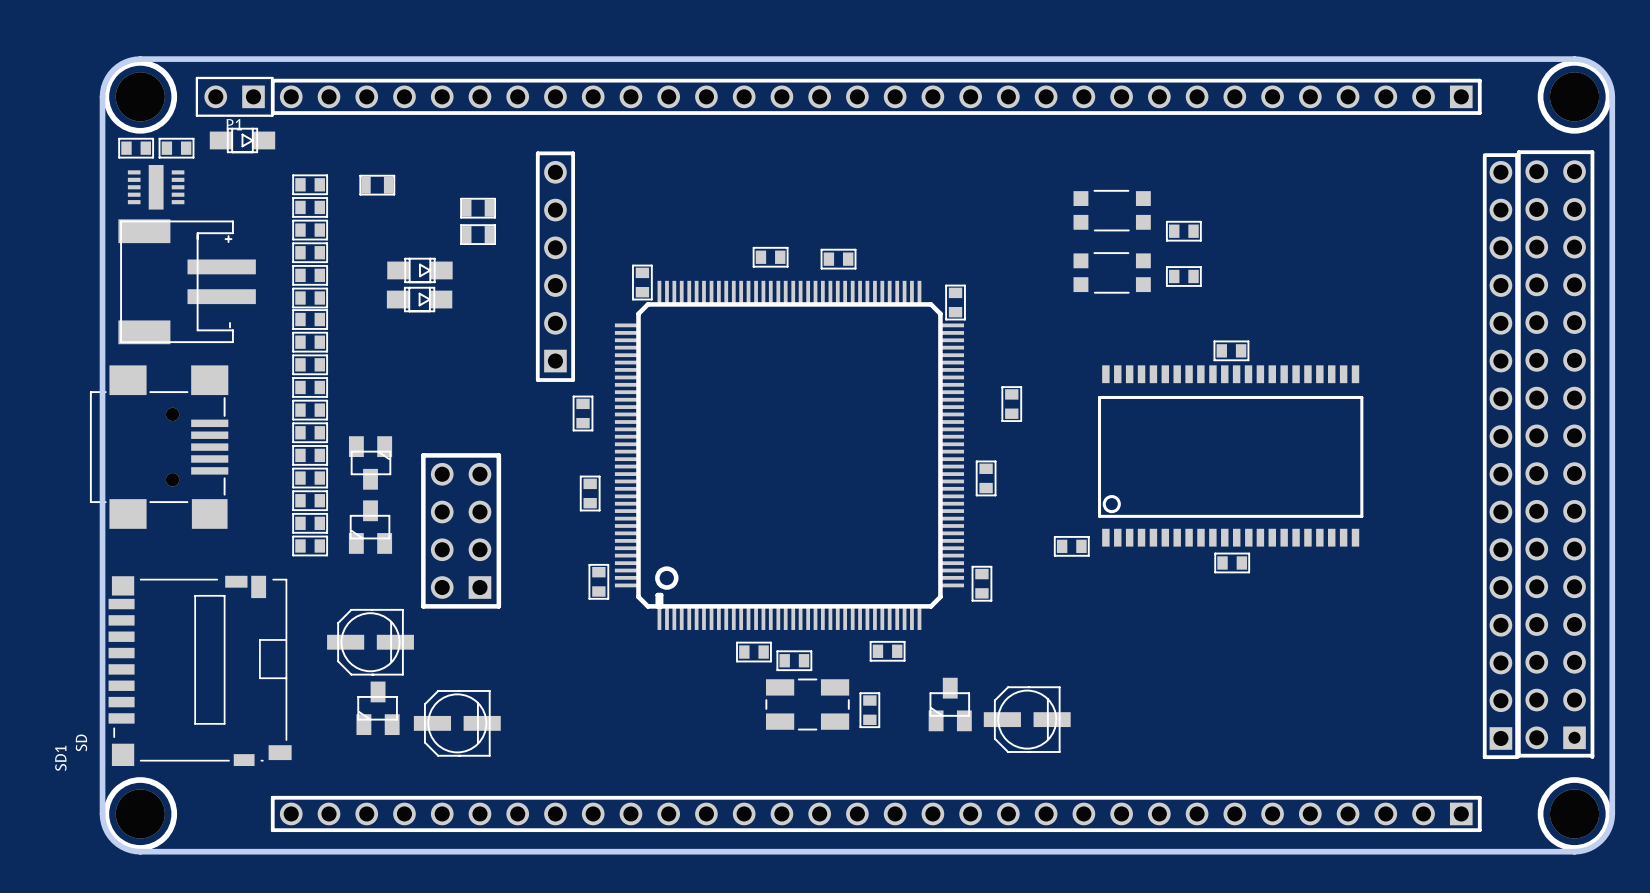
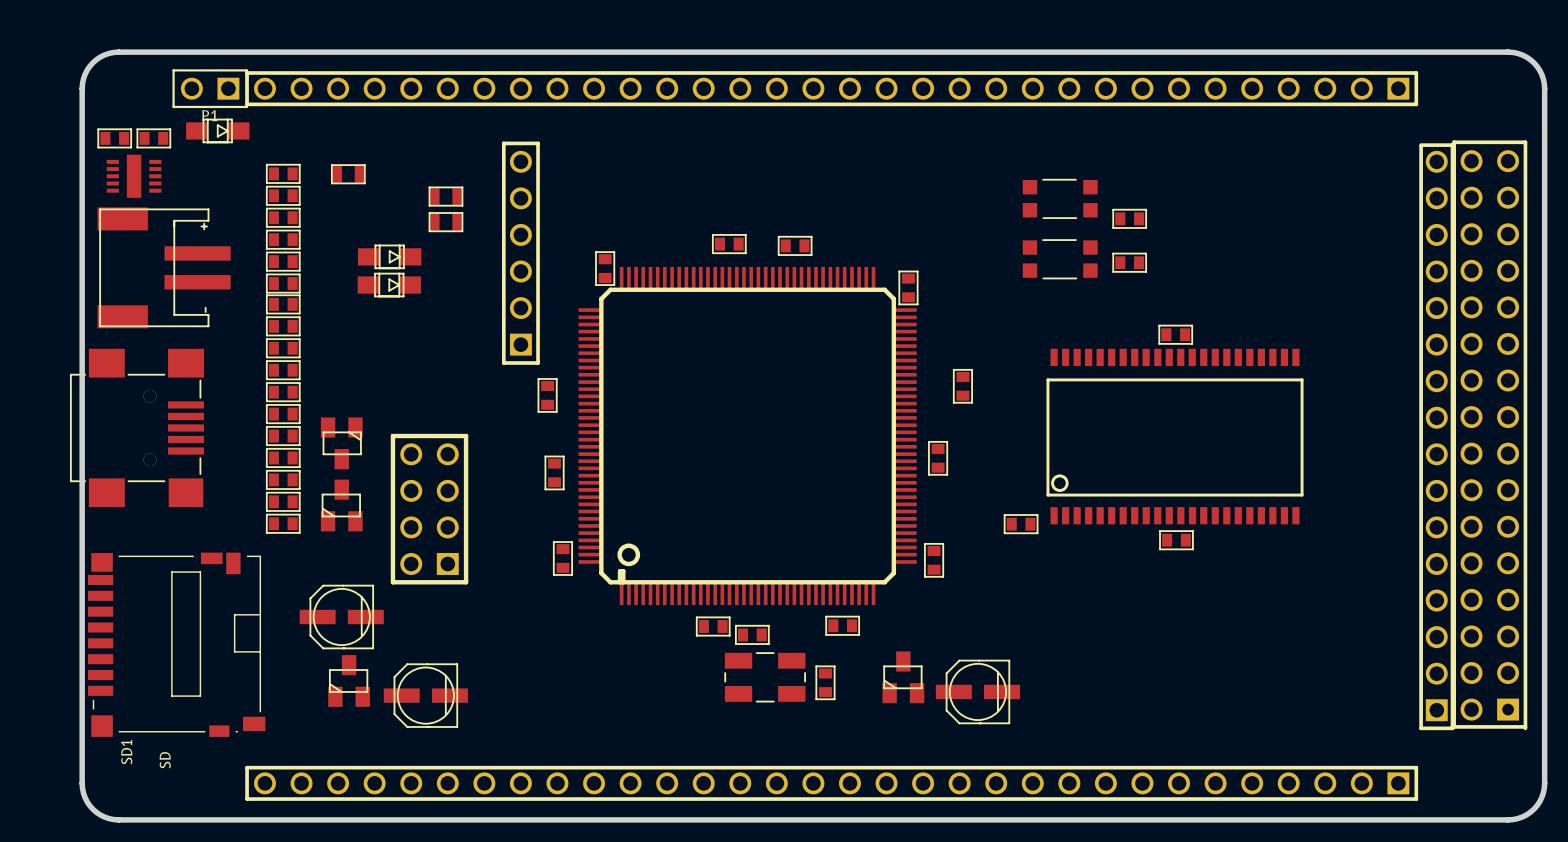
part: (140, 96) -> none
part: (1574, 96) -> none
SD1 value position: SD (81, 742) -> SD (165, 760)
SD1 name position: SD1 (60, 758) -> SD1 (126, 752)
part: (140, 813) -> none
part: (1574, 813) -> none

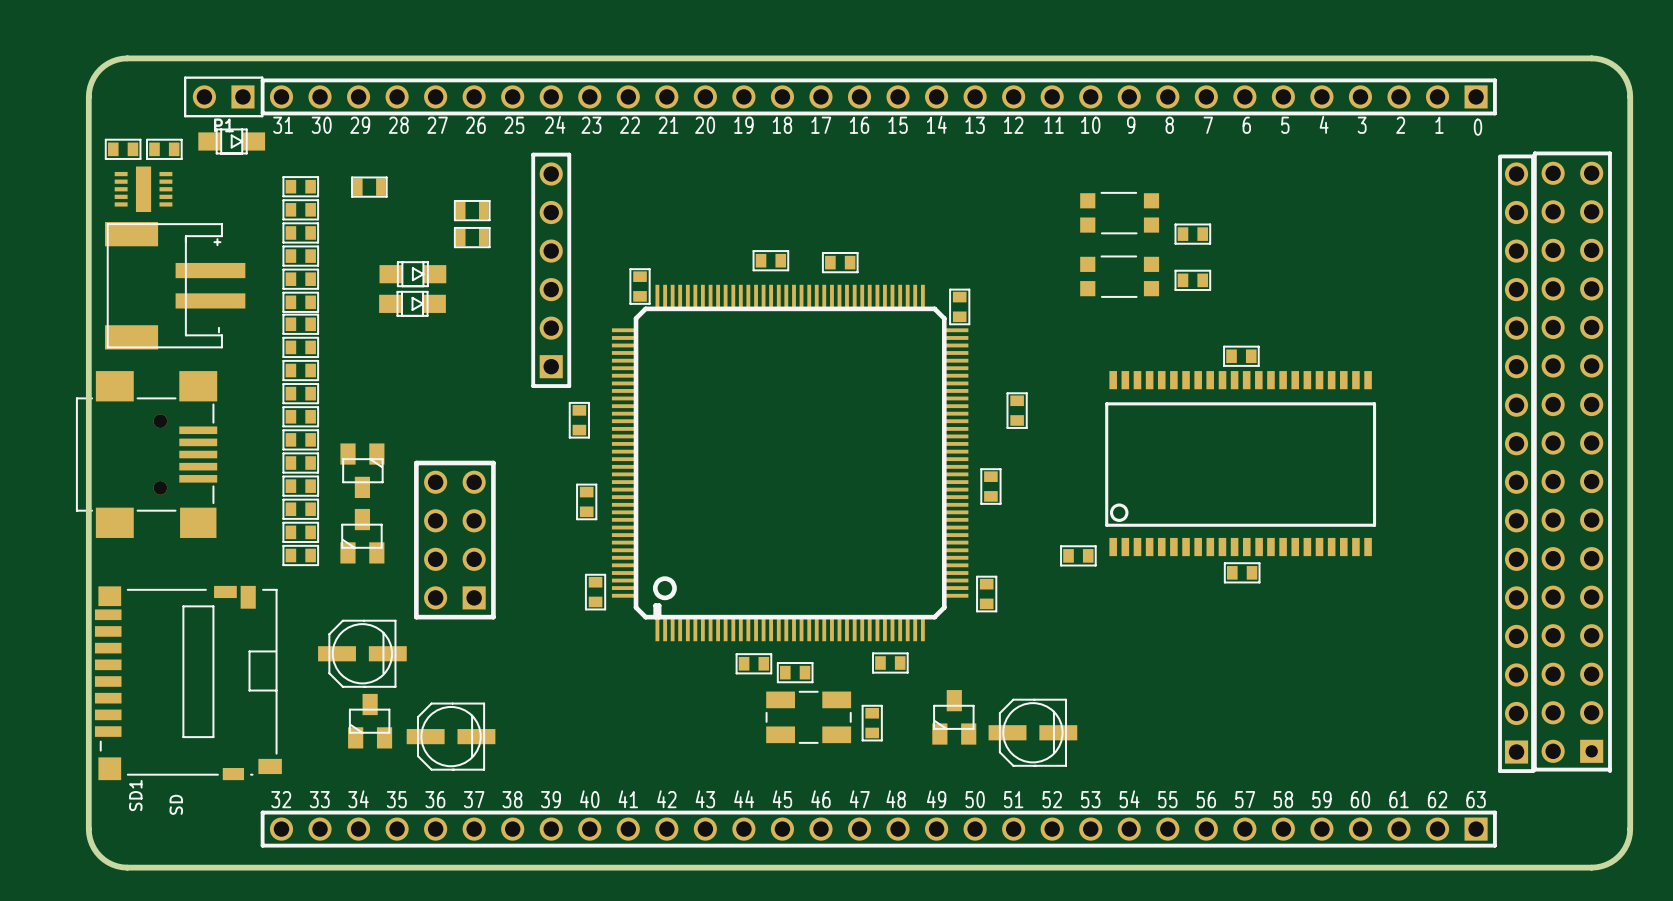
text: none -> 31 (283, 125)
text: none -> 30 (321, 125)
text: none -> 29 (360, 125)
text: none -> 28 (398, 125)
text: none -> 27 (437, 125)
text: none -> 26 (475, 125)
text: none -> 25 (514, 125)
text: none -> 24 (555, 124)
text: none -> 23 (591, 125)
text: none -> 22 (629, 125)
text: none -> 21 (668, 125)
text: none -> 20 (705, 125)
text: none -> 19 (743, 125)
text: none -> 18 (782, 125)
text: none -> 17 (821, 125)
text: none -> 16 (859, 125)
text: none -> 15 (898, 125)
text: none -> 14 (936, 124)
text: none -> 13 (975, 125)
text: none -> 12 (1013, 125)
text: none -> 11 (1054, 125)
text: none -> 10 (1090, 125)
text: none -> 9 (1131, 125)
text: none -> 8 (1169, 125)
text: none -> 7 (1208, 125)
text: none -> 6 (1246, 125)
text: none -> 5 (1285, 125)
text: none -> 4 (1324, 124)
text: none -> 3 (1362, 125)
text: none -> 2 (1400, 125)
text: none -> 1 (1439, 125)
text: none -> 0 (1478, 127)
text: none -> 32 (281, 799)
text: none -> 33 (319, 799)
text: none -> 34 (358, 799)
text: none -> 35 (396, 799)
text: none -> 36 (435, 799)
text: none -> 37 (474, 799)
text: none -> 38 (512, 799)
text: none -> 39 (550, 799)
text: none -> 40 (589, 799)
text: none -> 41 (628, 799)
text: none -> 42 (666, 799)
text: none -> 43 (705, 799)
text: none -> 44 (744, 799)
text: none -> 45 (782, 799)
text: none -> 46 (820, 799)
text: none -> 47 (859, 799)
text: none -> 48 (896, 799)
text: none -> 49 (936, 799)
text: none -> 50 (975, 799)
text: none -> 51 (1013, 799)
text: none -> 52 (1052, 799)
text: none -> 53 (1090, 799)
text: none -> 54 (1129, 799)
text: none -> 55 (1167, 799)
text: none -> 56 (1206, 799)
text: none -> 57 (1245, 799)
text: none -> 58 (1283, 799)
text: none -> 59 (1321, 799)
text: none -> 60 (1360, 799)
text: none -> 61 (1399, 799)
text: none -> 62 (1437, 799)
text: none -> 63 (1476, 799)

